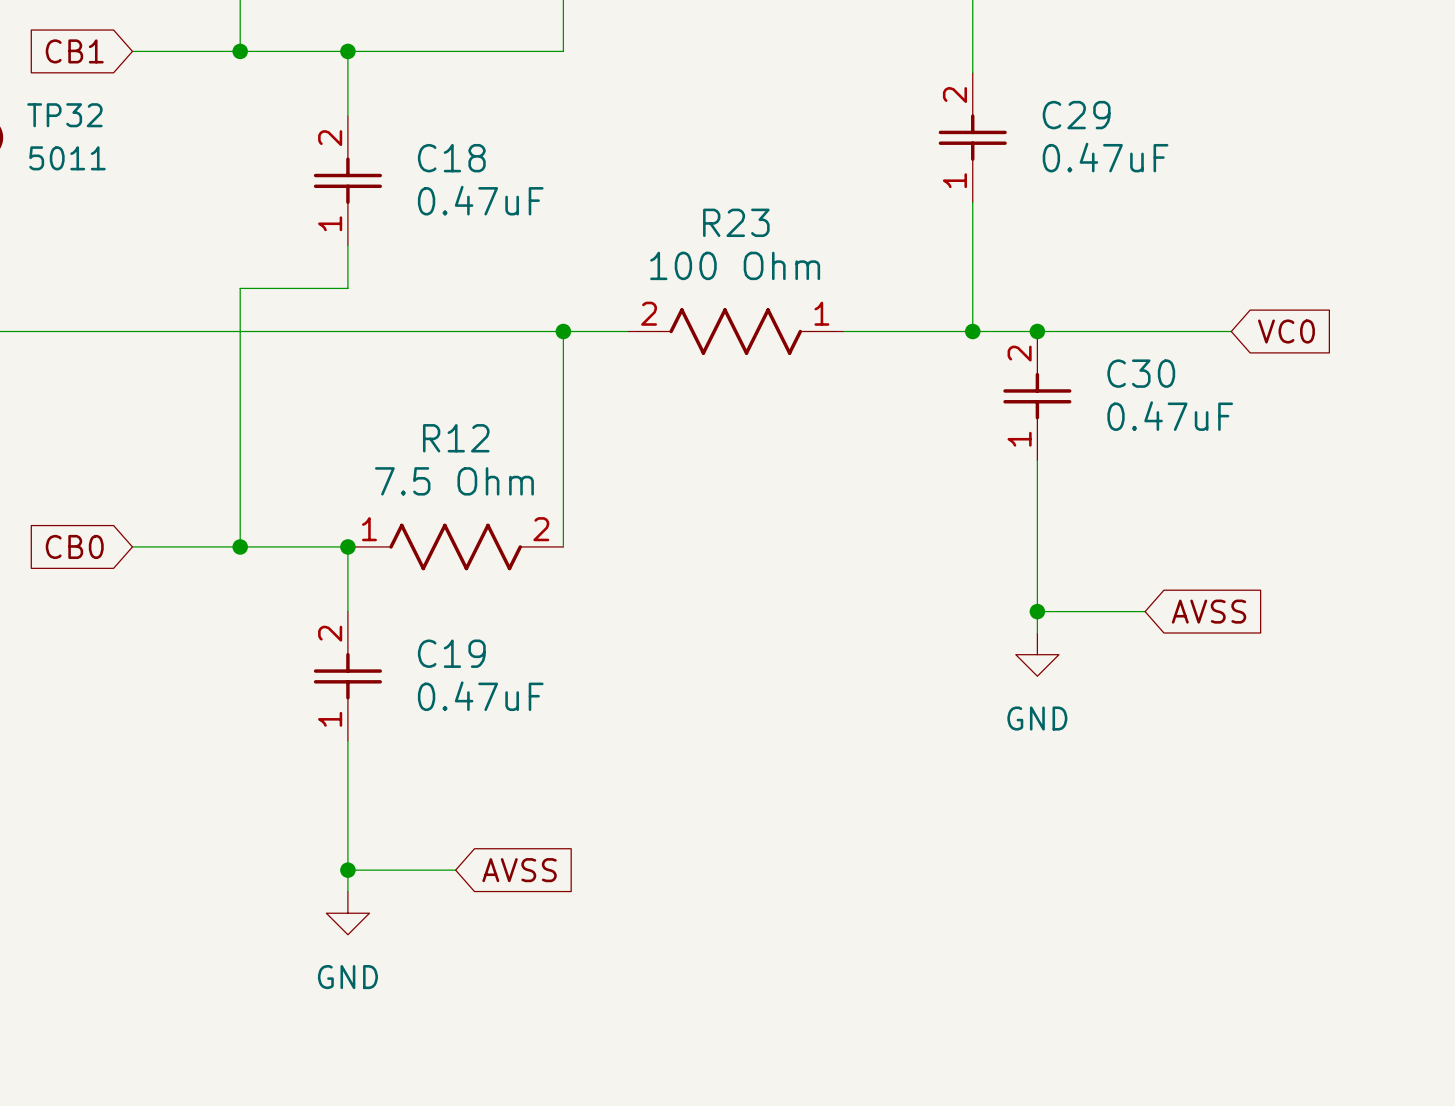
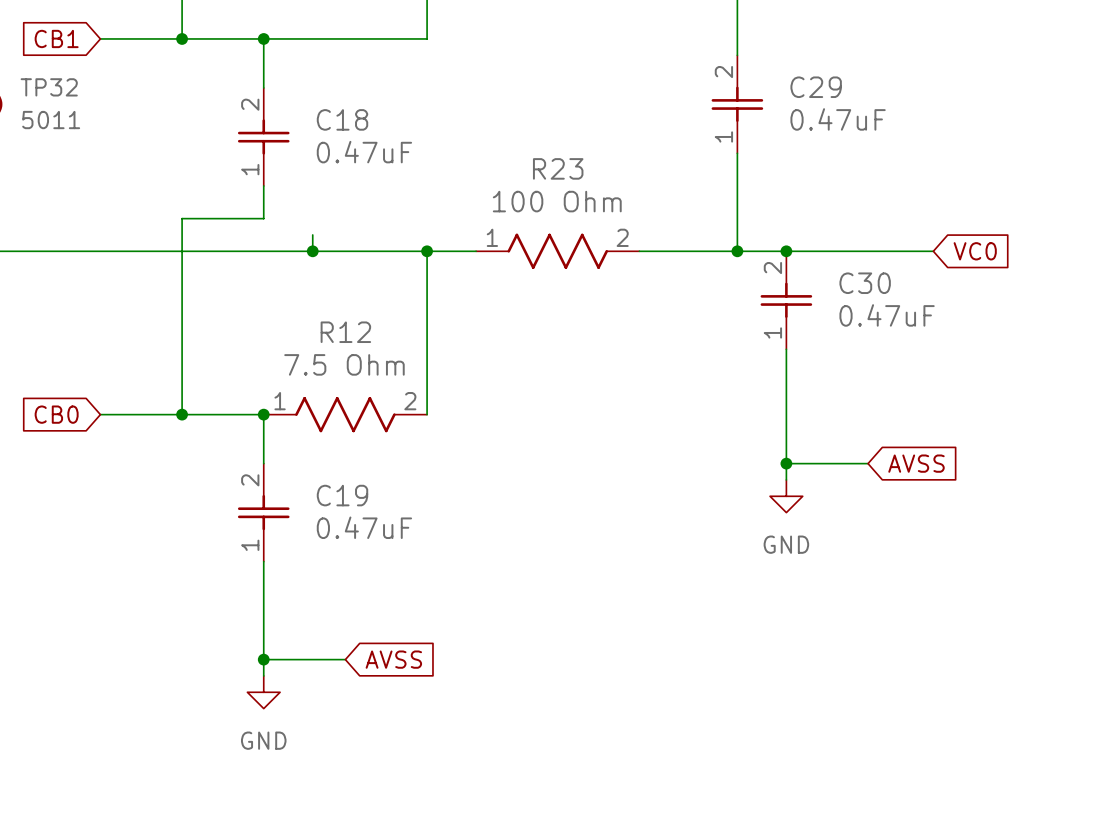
wire: none -> (312, 234) (312, 251)
junction: none -> (312, 251)
R23 rotation: 0° (735, 331) -> 180° (557, 251)

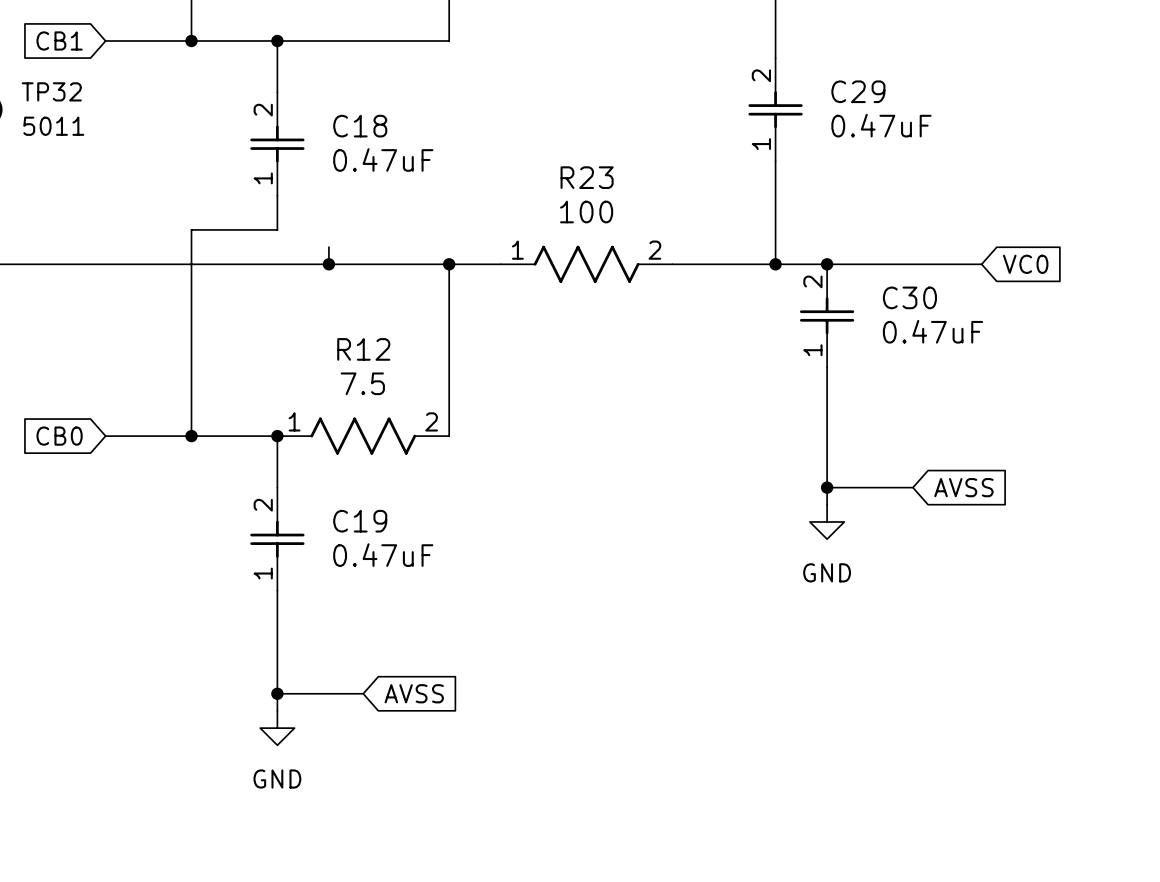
R23 value: 100 Ohm (557, 201) -> 100 (586, 212)
R12 value: 7.5 Ohm (344, 364) -> 7.5 (362, 383)

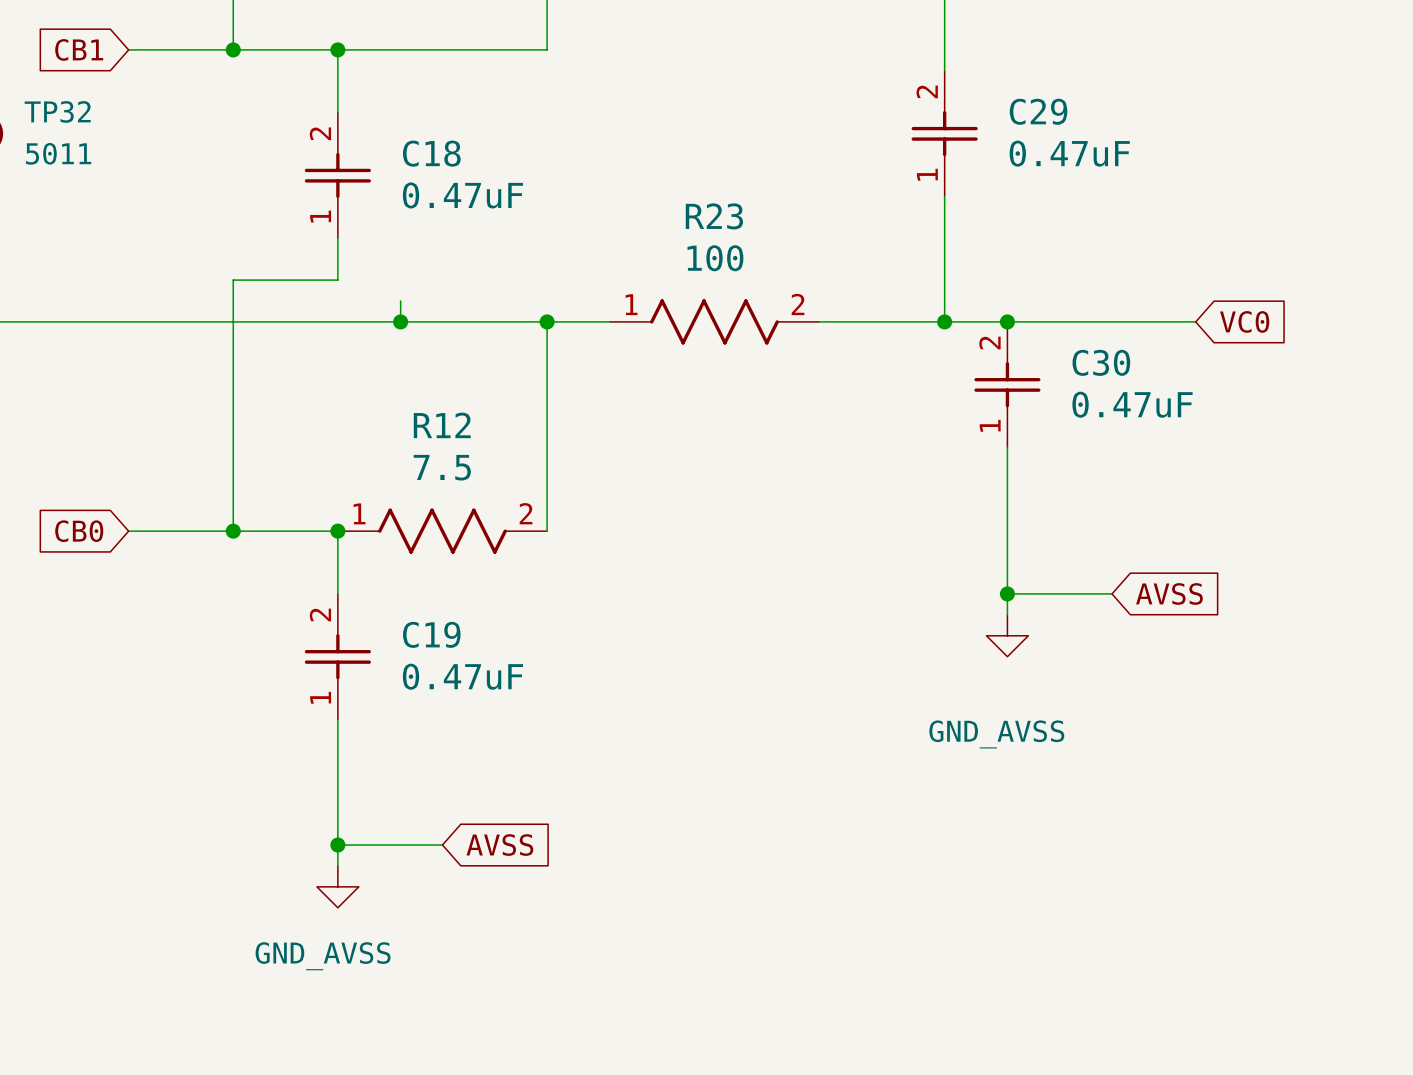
power symbol: GND (827, 521) -> GND_AVSS (1007, 635)
power symbol: GND (277, 728) -> GND_AVSS (337, 886)

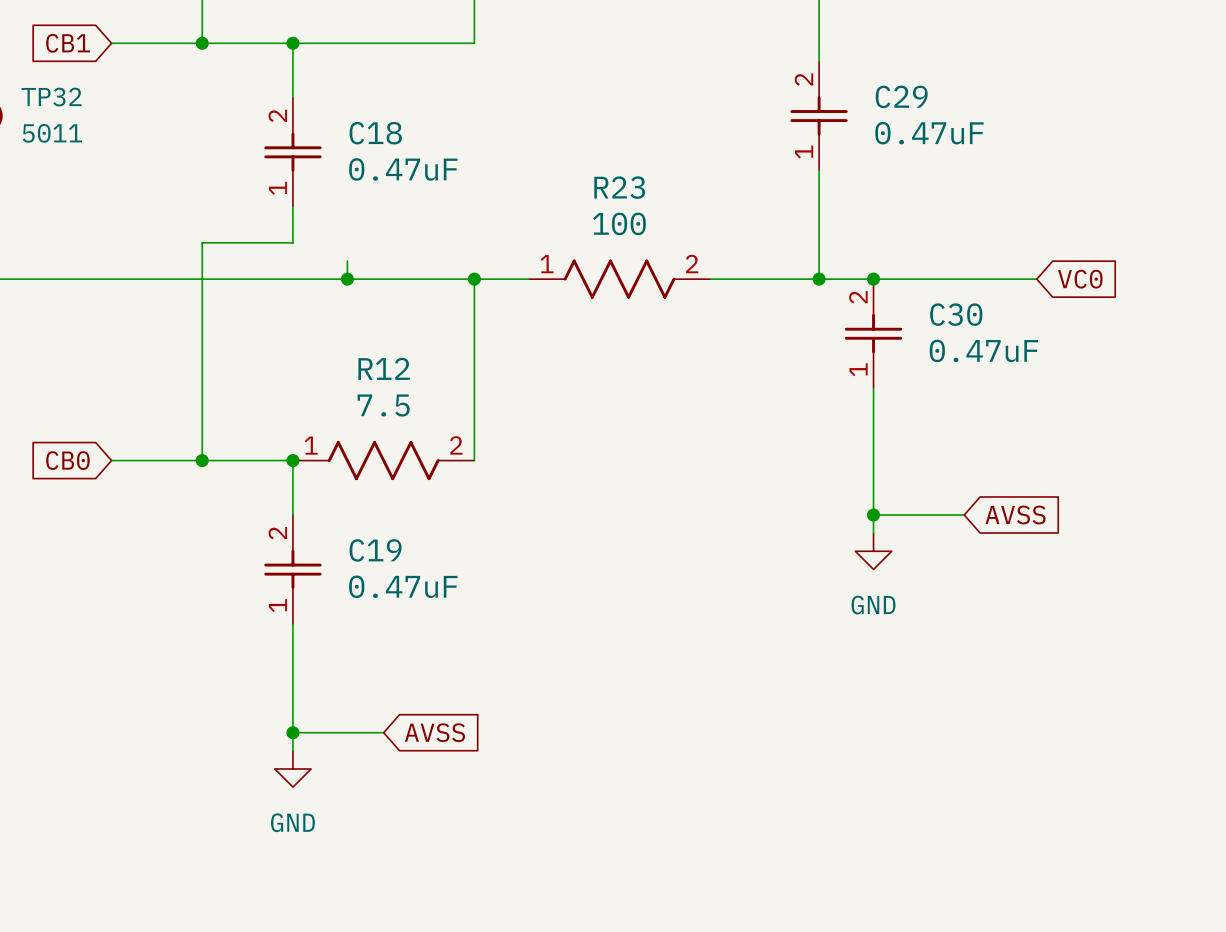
power symbol: GND_AVSS (1007, 635) -> GND (873, 551)
power symbol: GND_AVSS (337, 886) -> GND (292, 768)

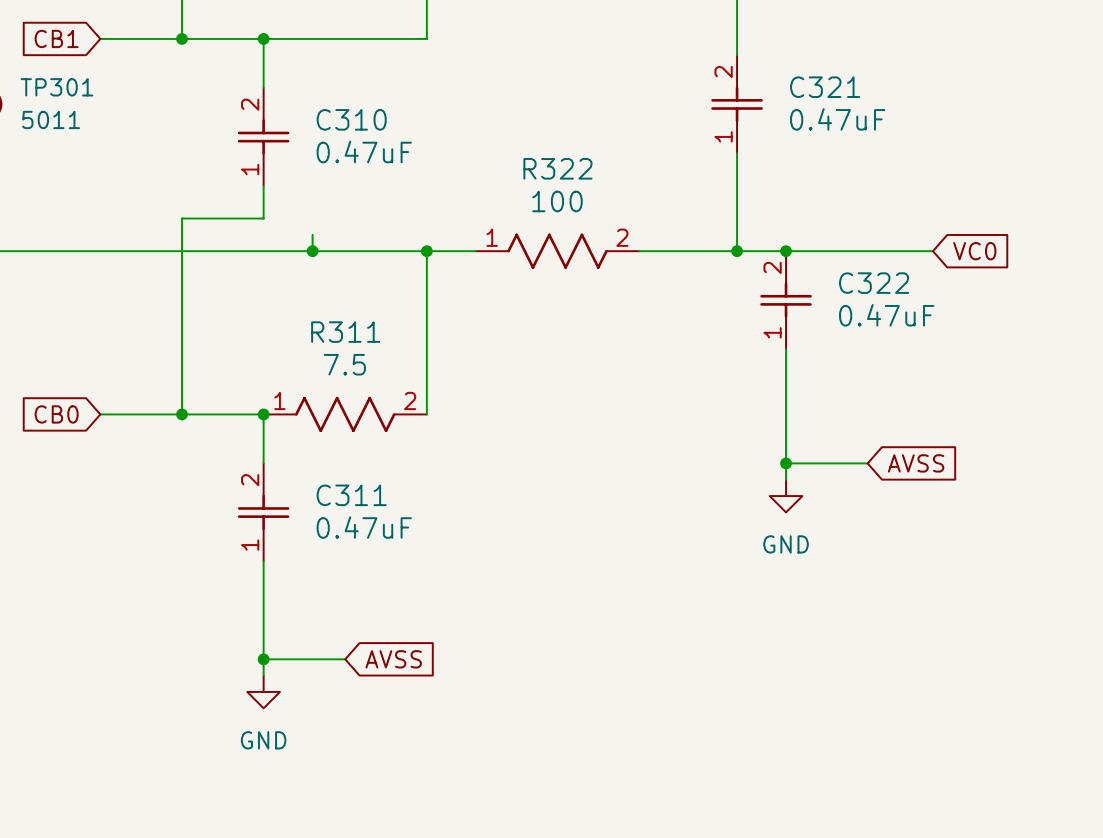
C29 name: C29 (901, 96) -> C321 (825, 87)
TP32 name: TP32 (51, 97) -> TP301 (56, 87)
C18 name: C18 (375, 133) -> C310 (351, 119)
R23 name: R23 (619, 187) -> R322 (557, 168)
C30 name: C30 (956, 314) -> C322 (874, 283)
R12 name: R12 (384, 368) -> R311 (345, 332)
C19 name: C19 (375, 550) -> C311 (351, 495)

